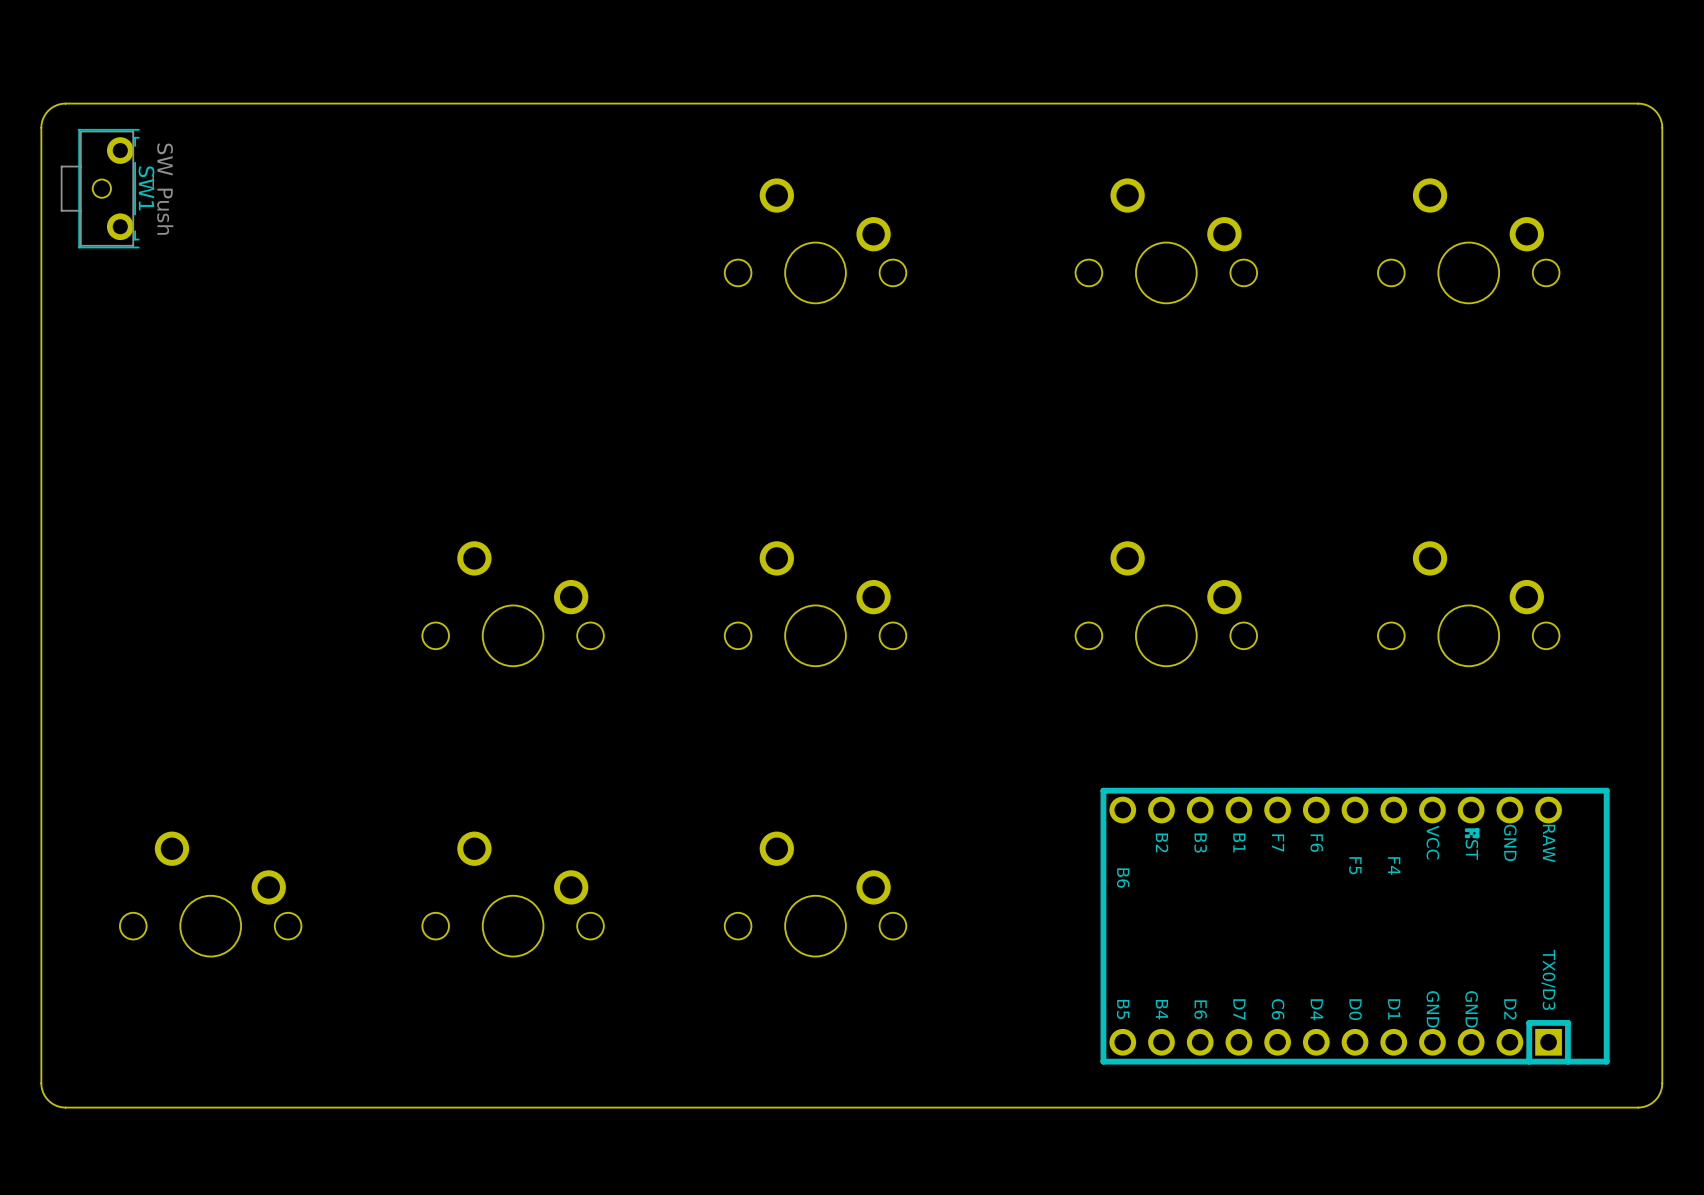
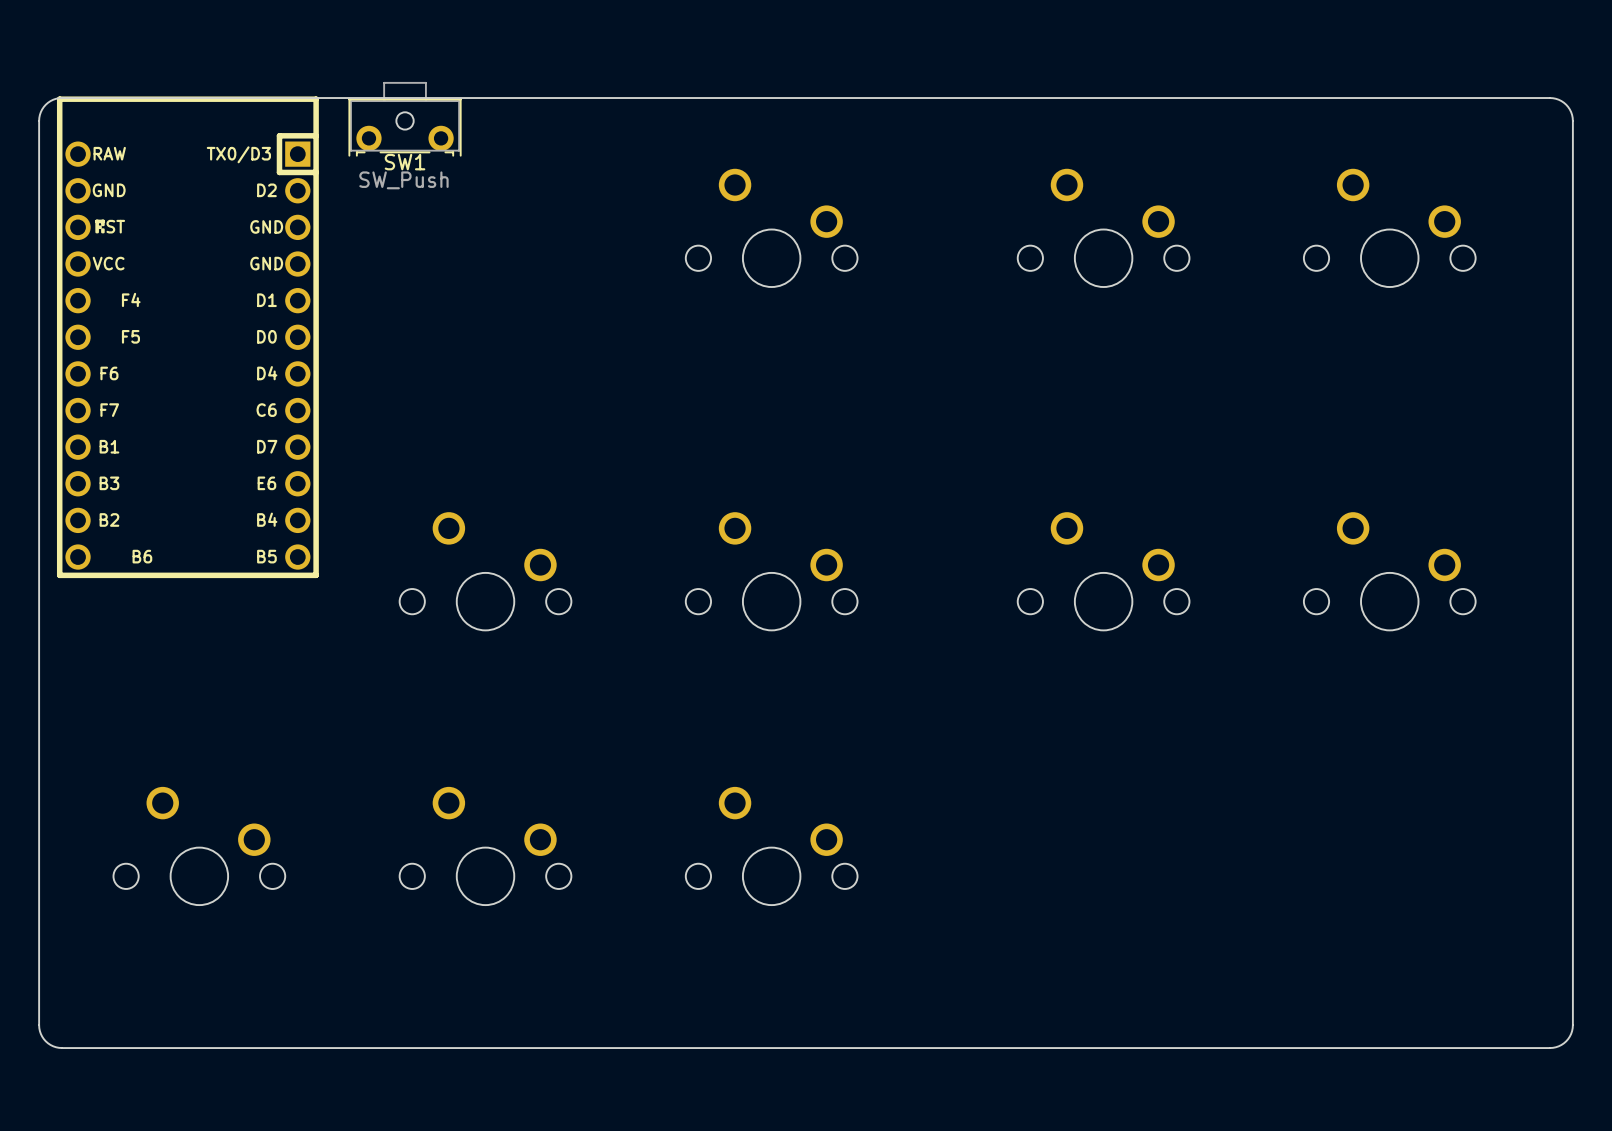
SW1 rotation: 0° (100, 188) -> 90° clockwise (405, 119)
SW1 position: (100, 188) -> (405, 119)
part: none -> (187, 337)
part: (1355, 926) -> none

